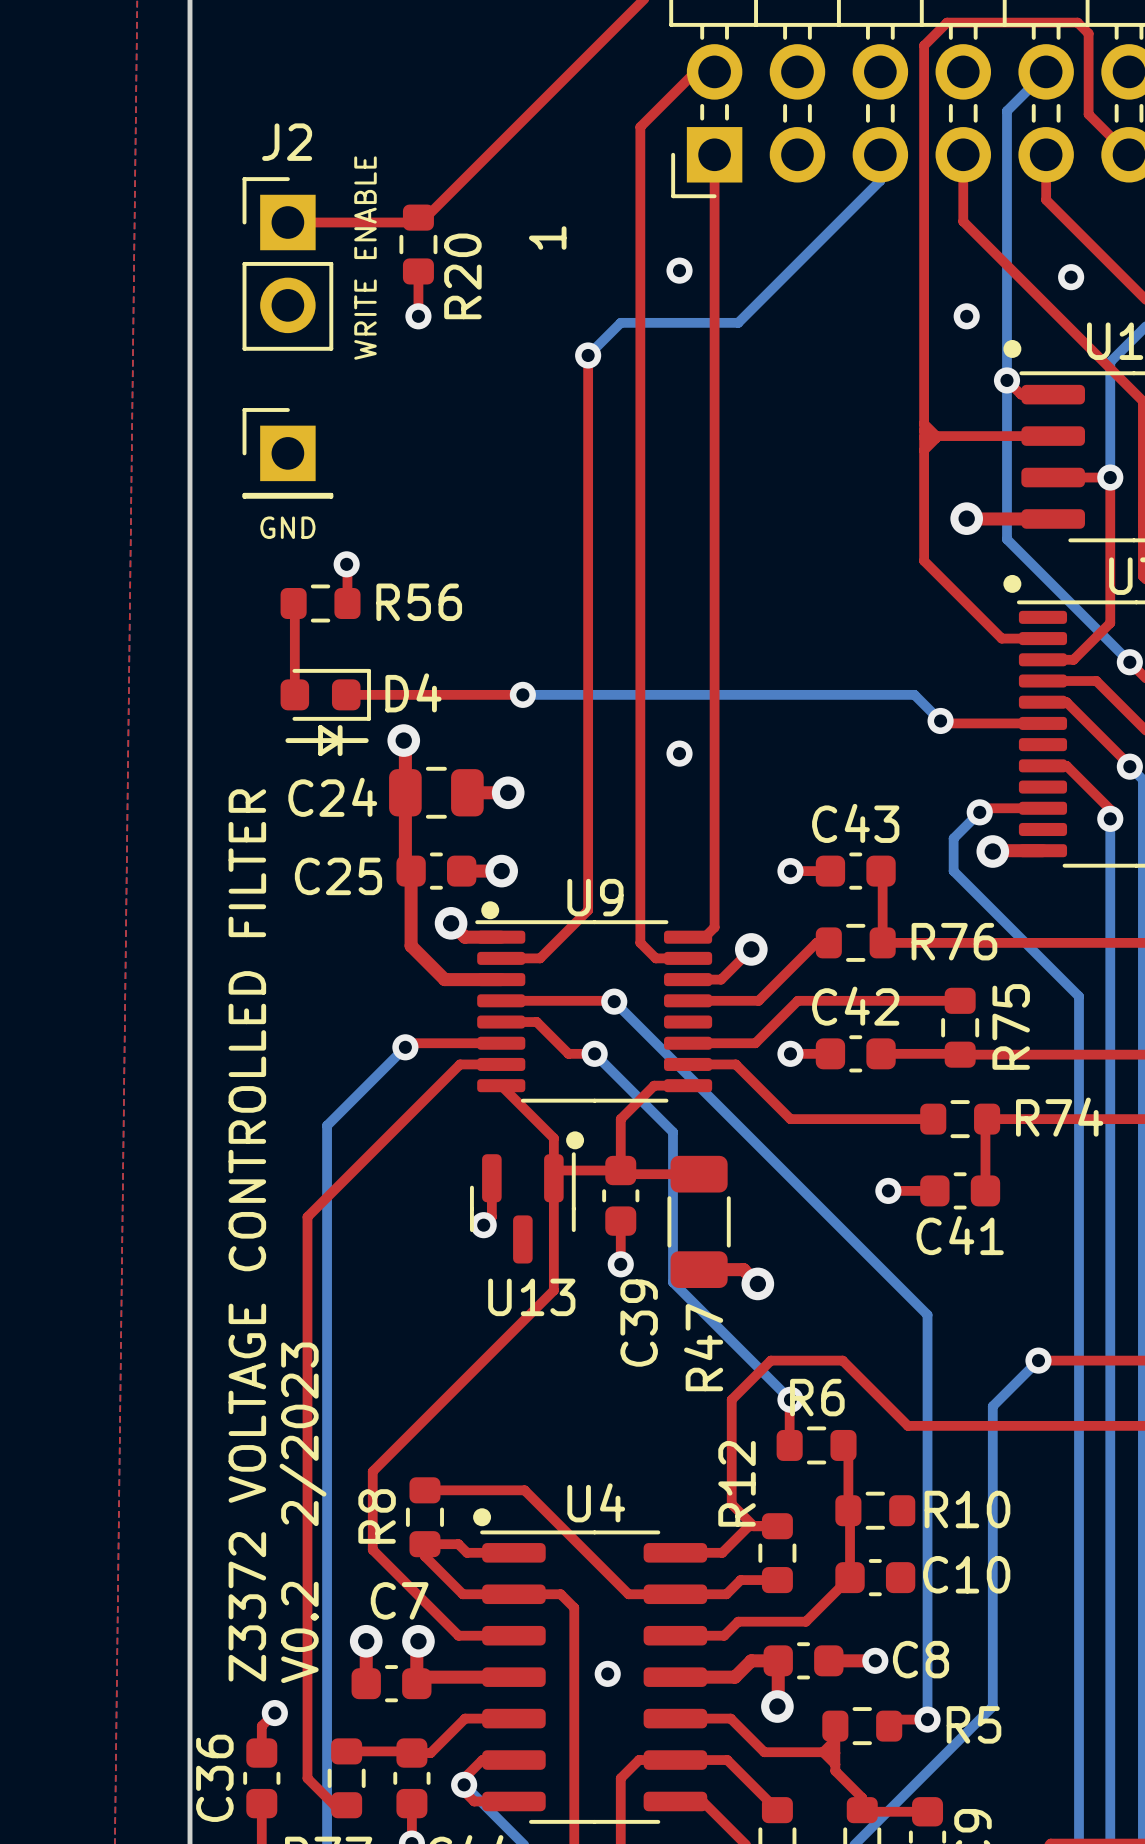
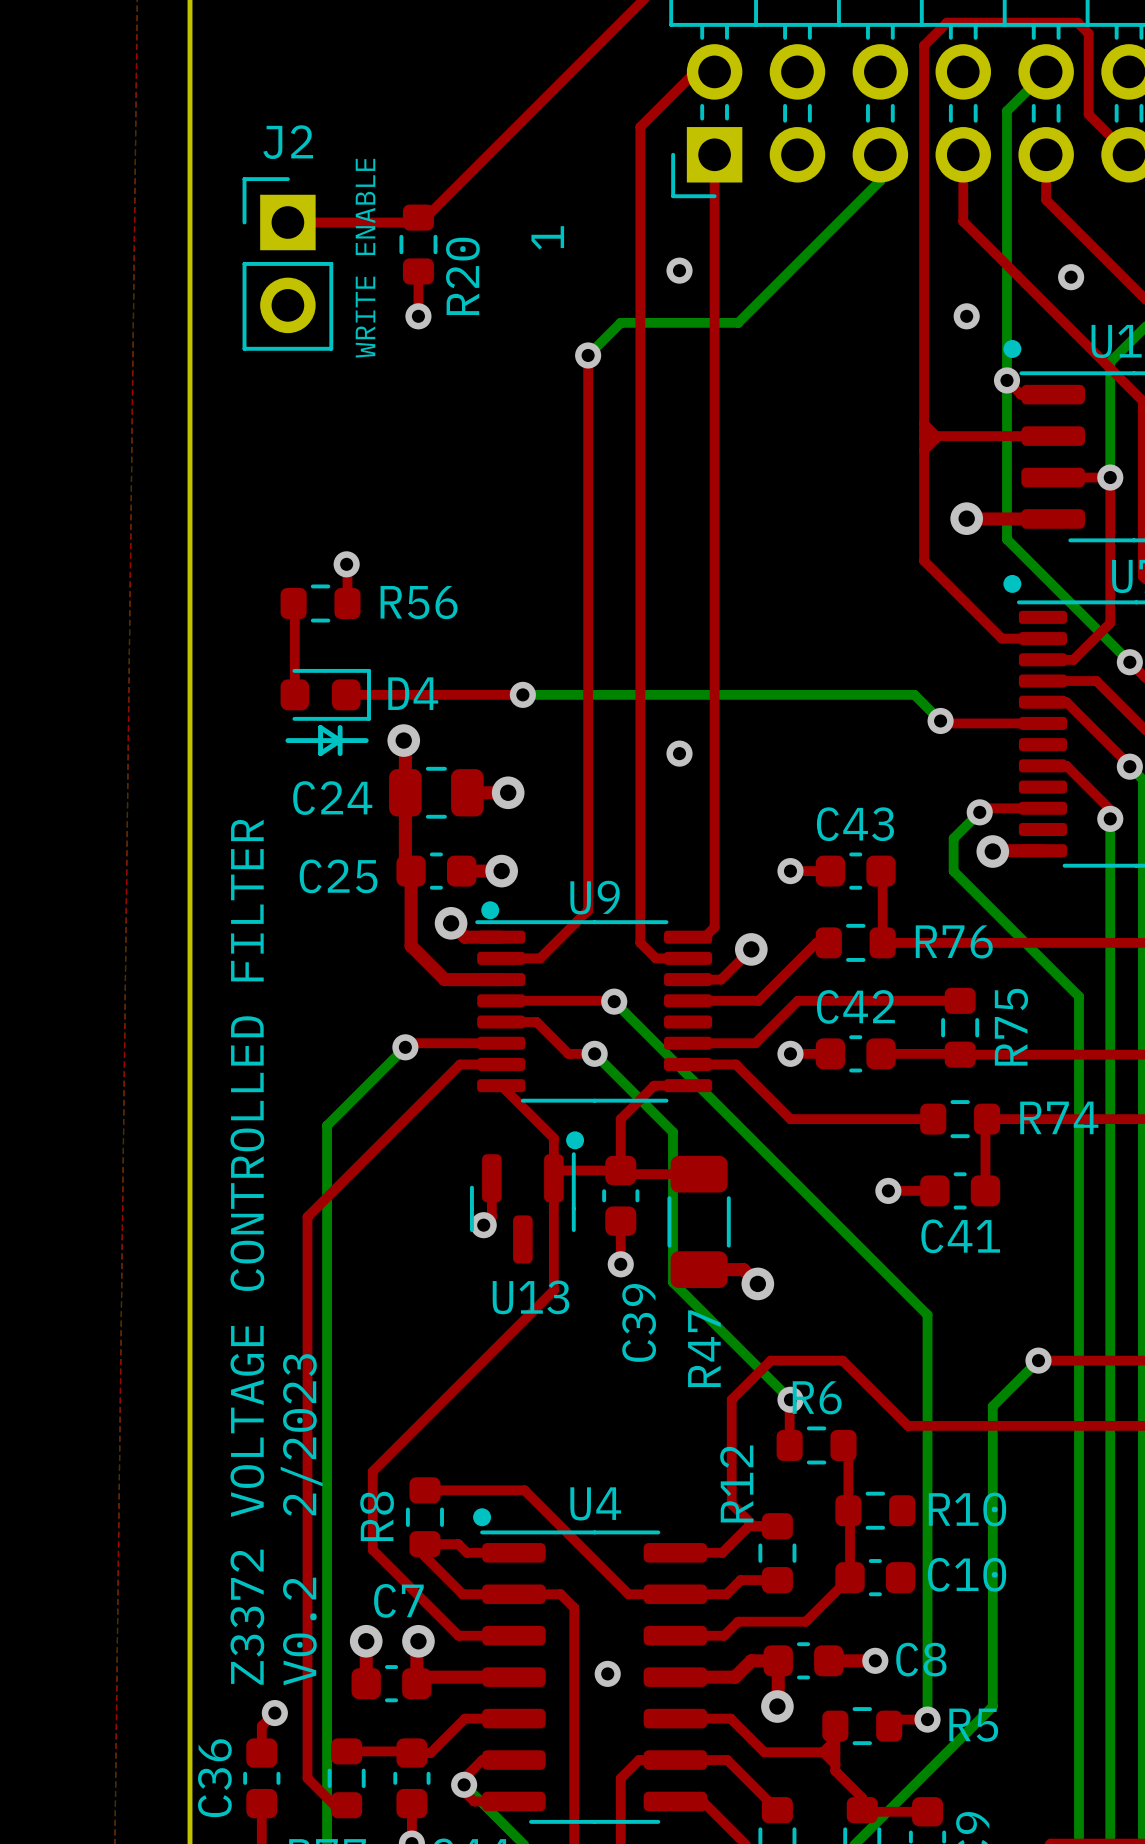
part: (287, 453) -> none
text: GND (287, 527) -> none

